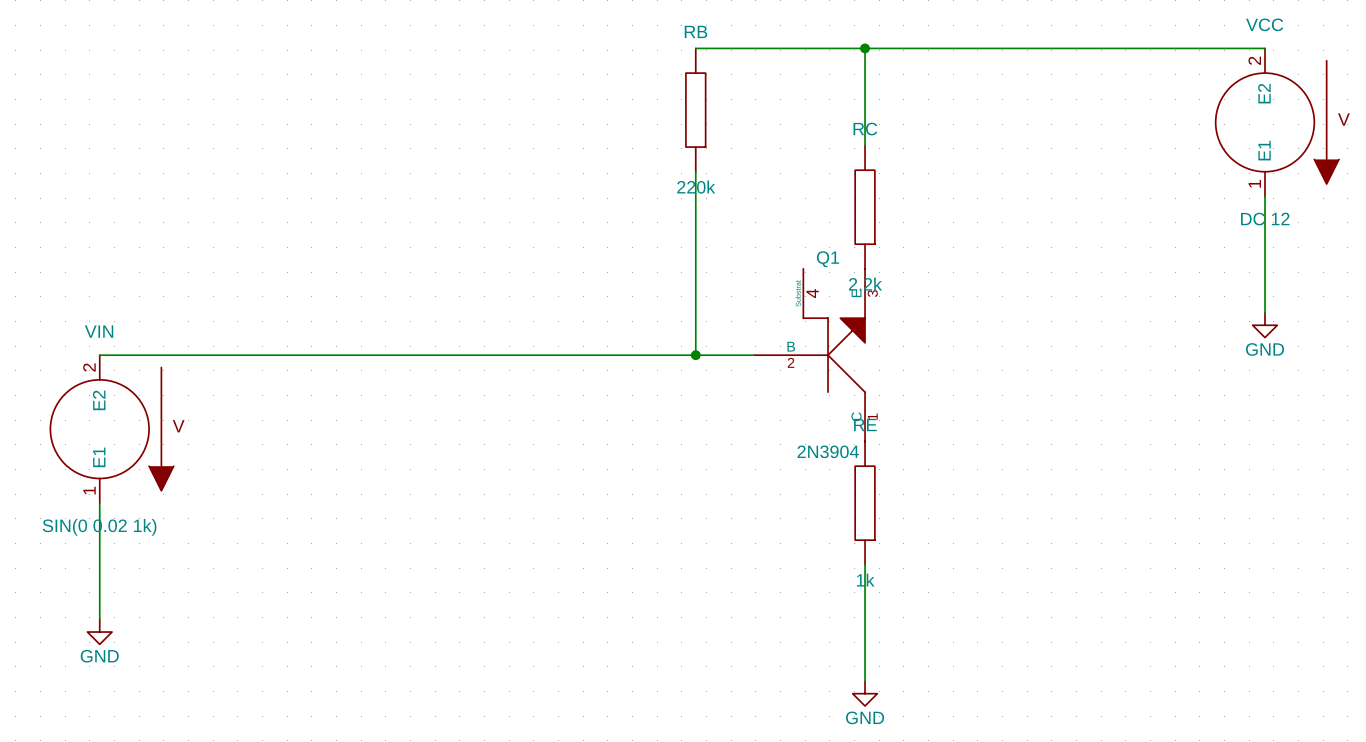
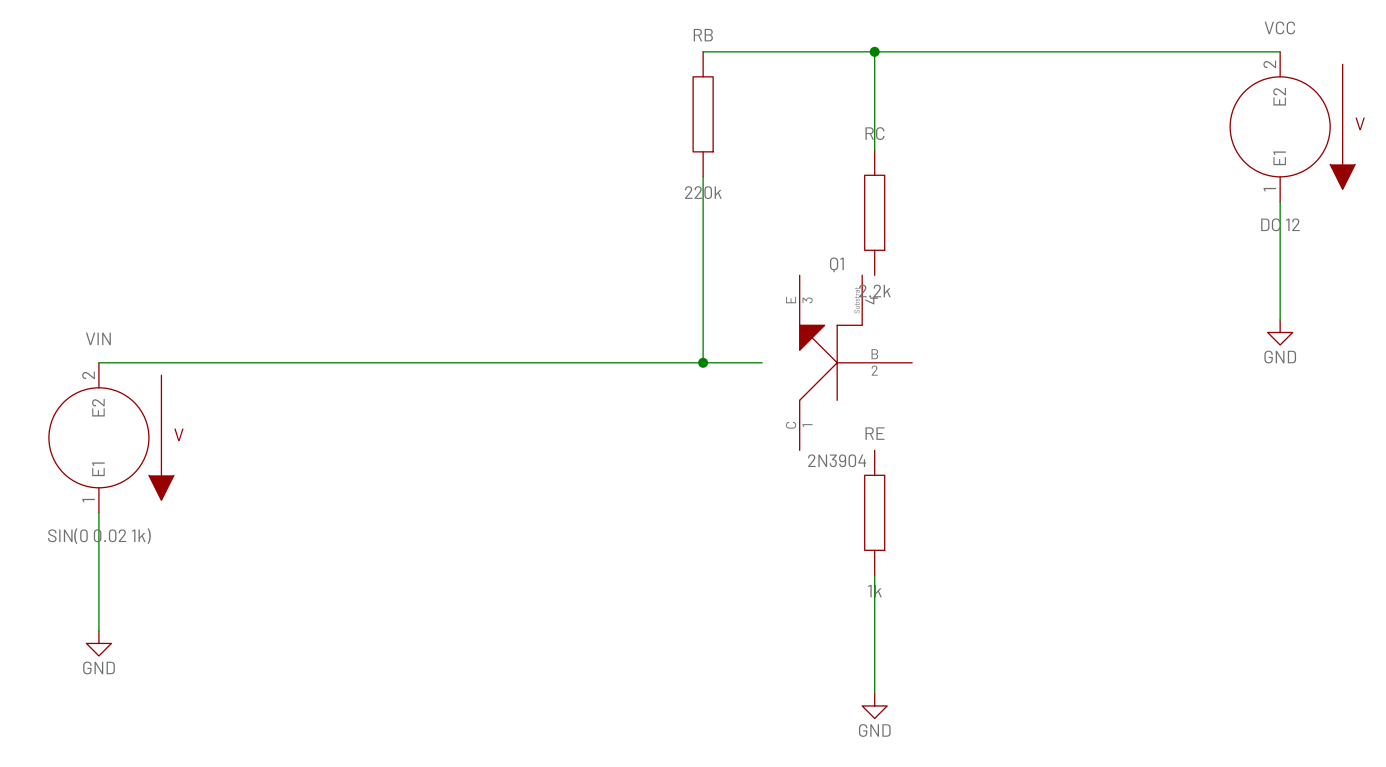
Q1 flip: as is (834, 355) -> left-right (830, 362)

